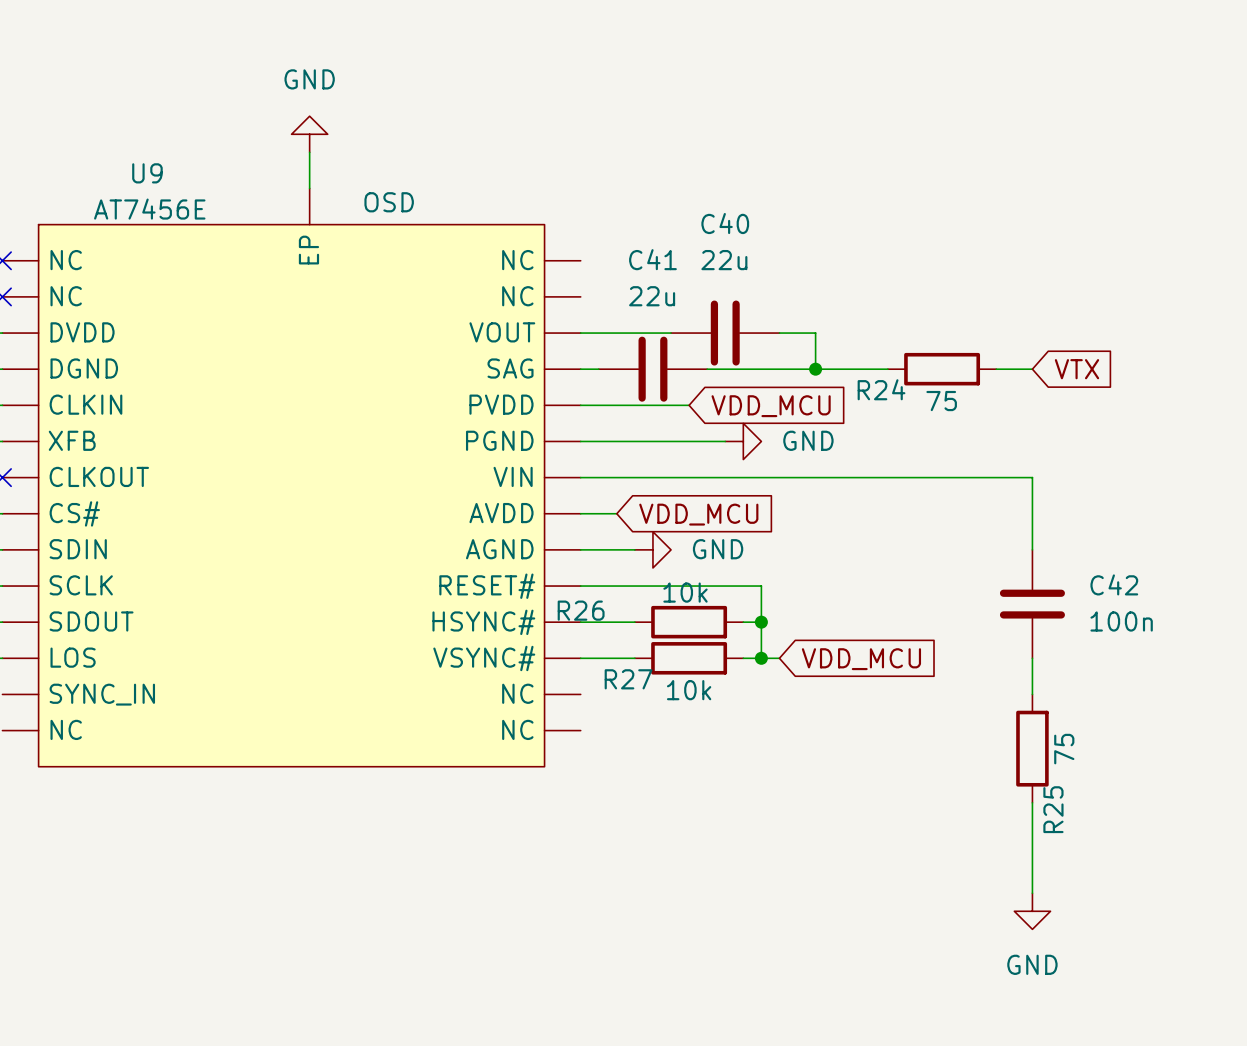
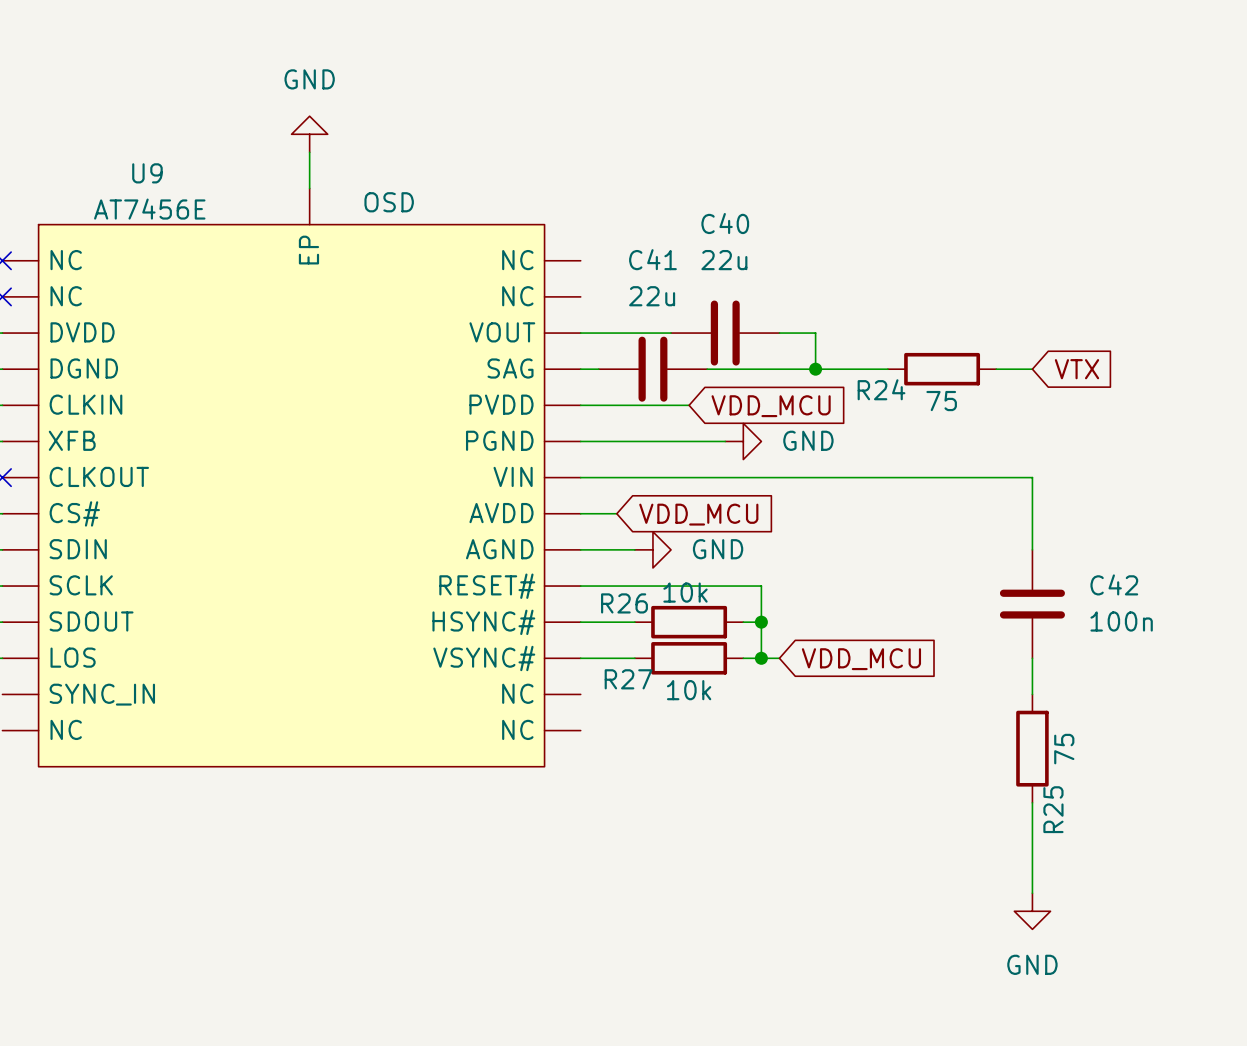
R26 name position: R26 (581, 610) -> R26 (624, 603)

